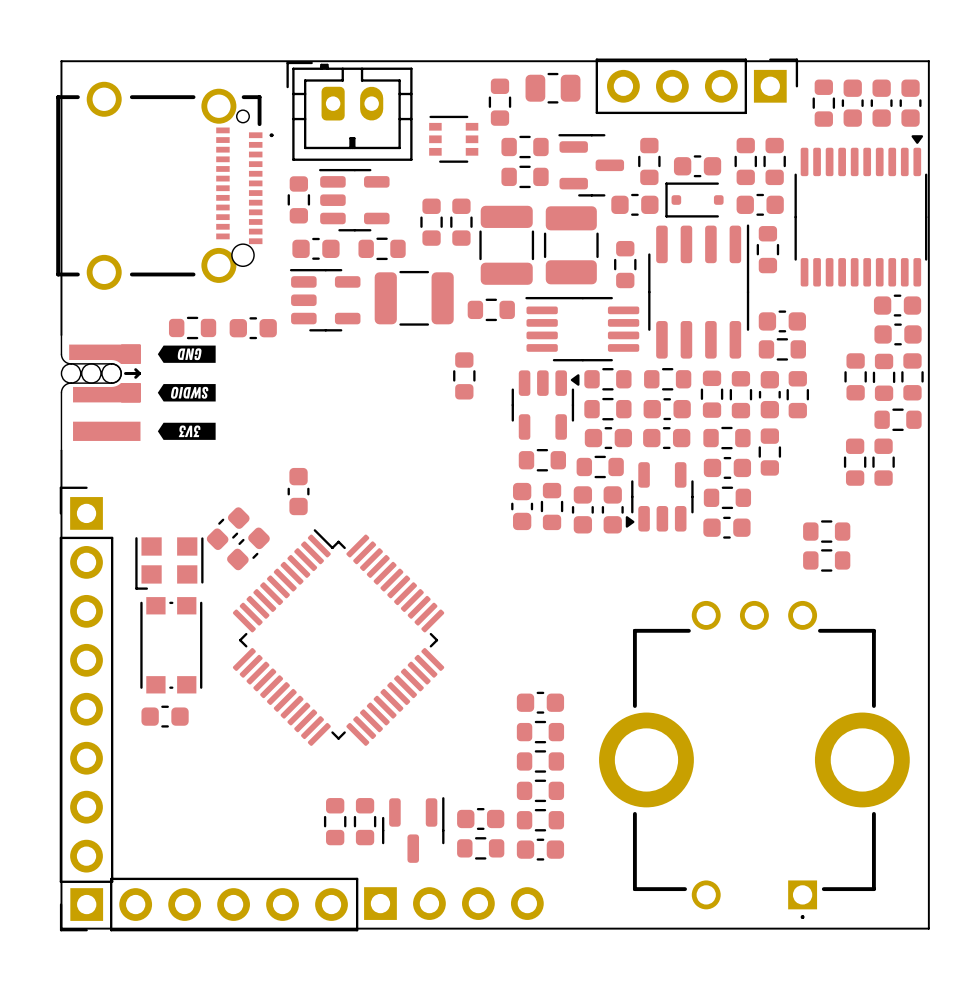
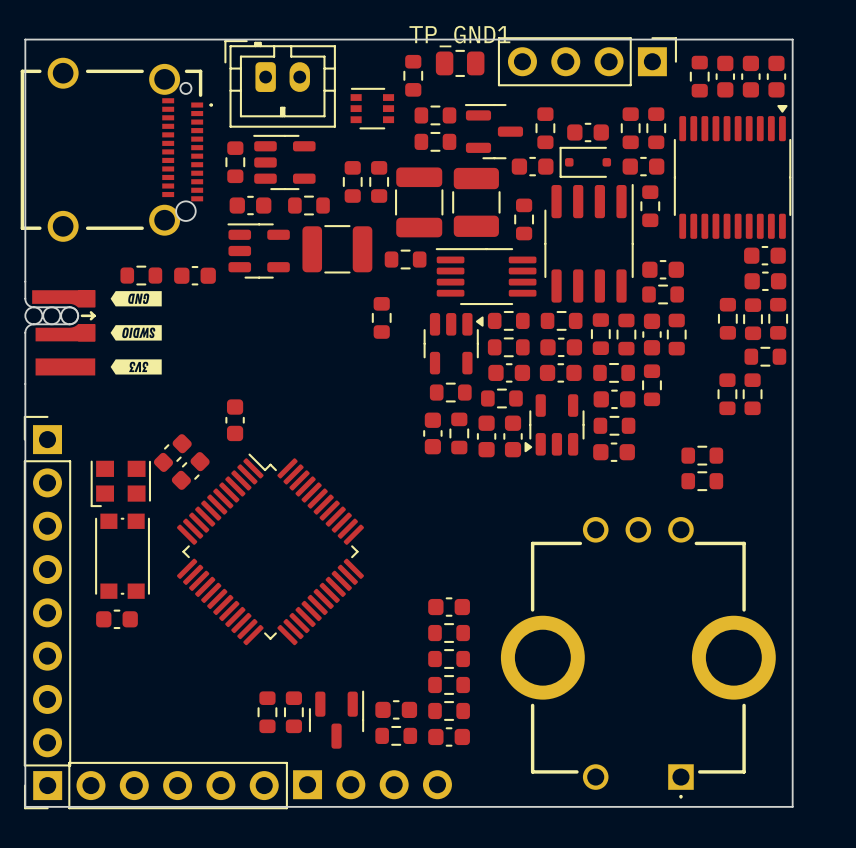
TP_GND1 name: none -> TP_GND1 (459, 36)

